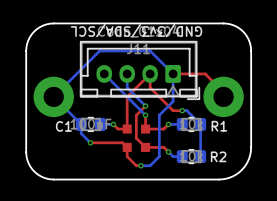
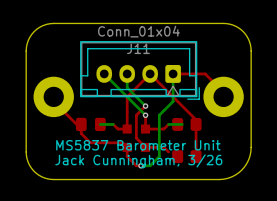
text: GND/3v3/SDA/SCL (136, 30) -> none
top track: (150, 73) (150, 87) (173, 110) (182, 110) -> (150, 73) (196, 119) (196, 156)
bottom track: (173, 73) (150, 50) (99, 50) (53, 96) (81, 124) (81, 133) (90, 142) -> none
top track: none -> (49, 96) (76, 124) (81, 124) (81, 133) (90, 142)
bottom track: (182, 110) (186, 110) (200, 124) (200, 156) -> none
via: (182, 110) -> none
C1 side: bottom (90, 124) -> top (90, 124)
via: (113, 124) -> none
via: (168, 124) -> none
R1 side: bottom (191, 124) -> top (186, 124)
via: (90, 142) -> none
text: none -> MS5837 Barometer Unit (138, 145)
bottom track: (168, 151) (173, 156) (182, 156) -> none
via: (168, 151) -> none
R2 side: bottom (191, 156) -> top (186, 156)
text: none -> Jack Cunningham, 3/26 (138, 161)

